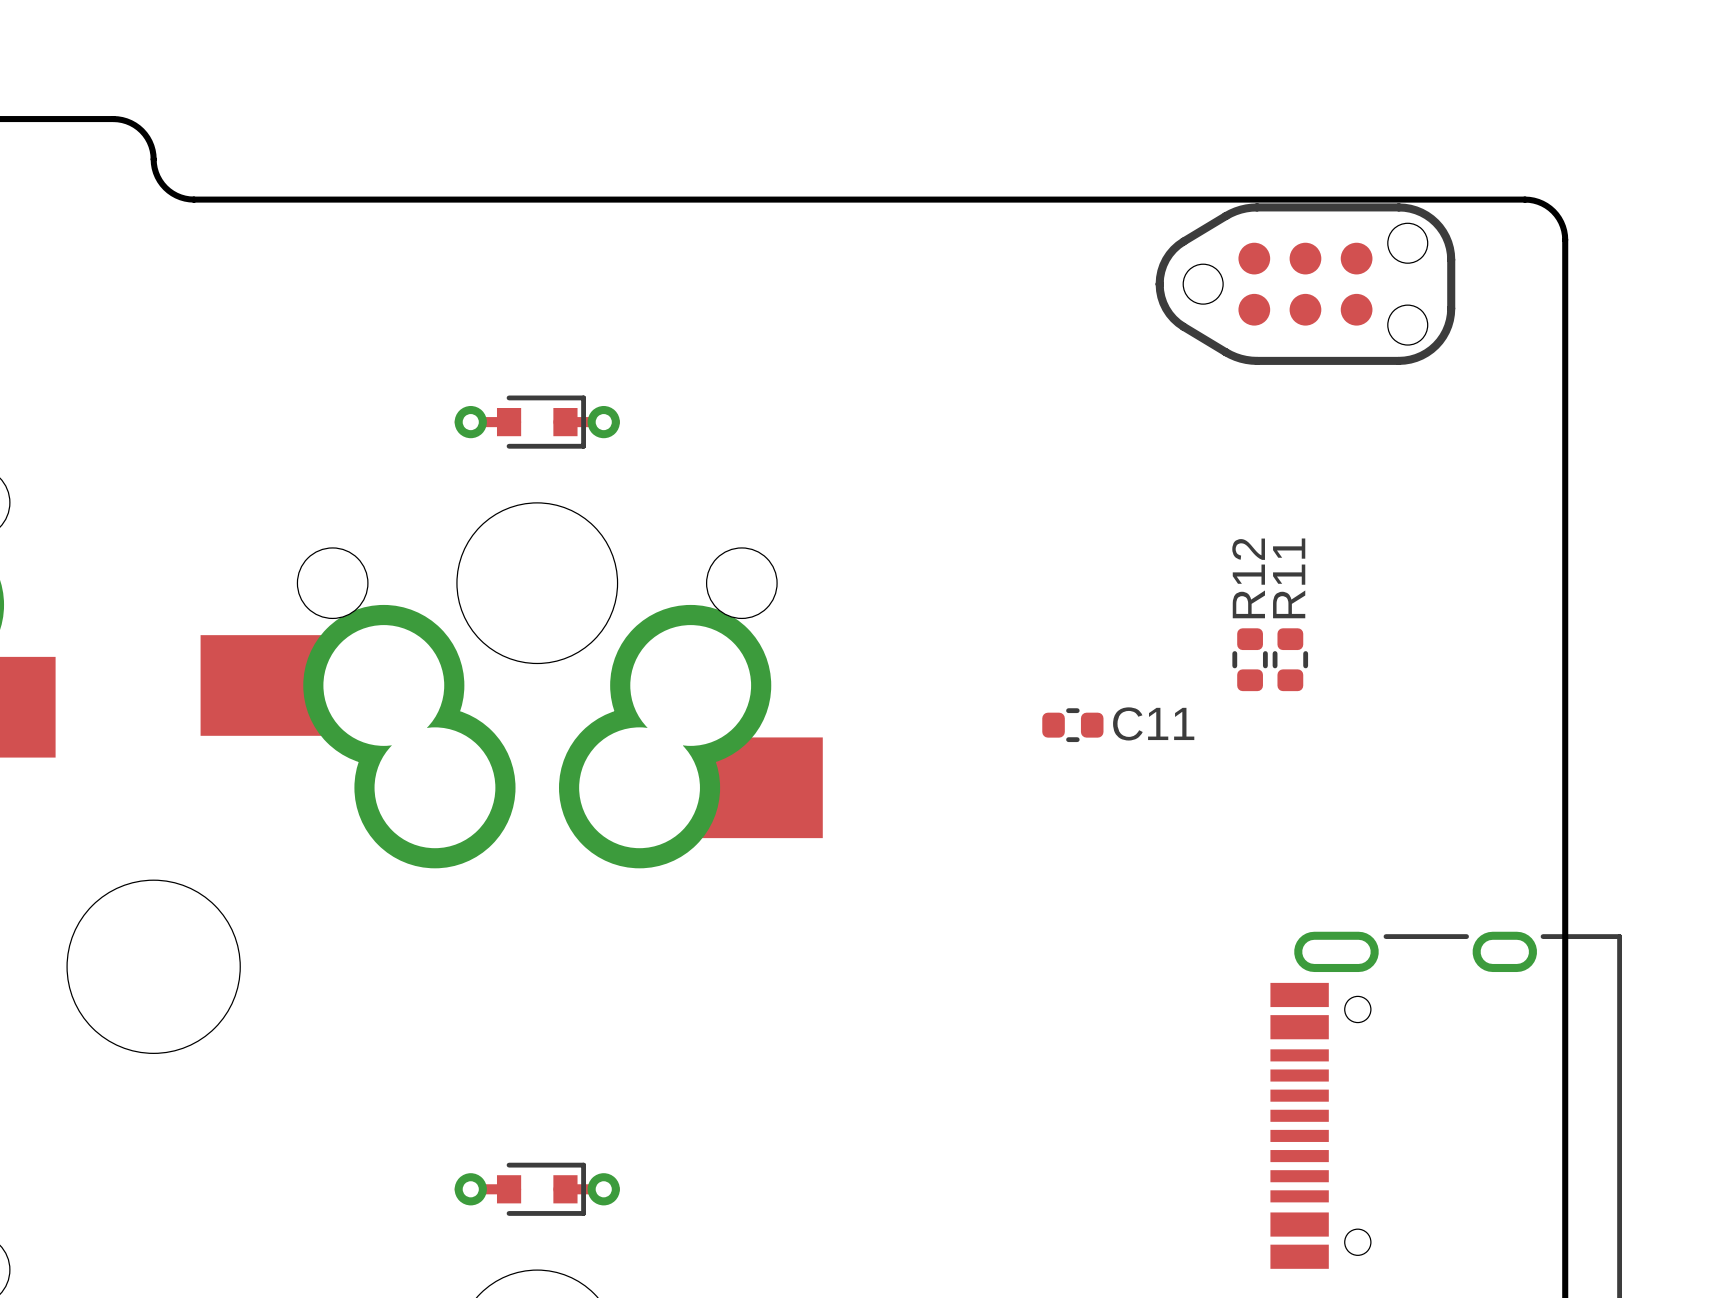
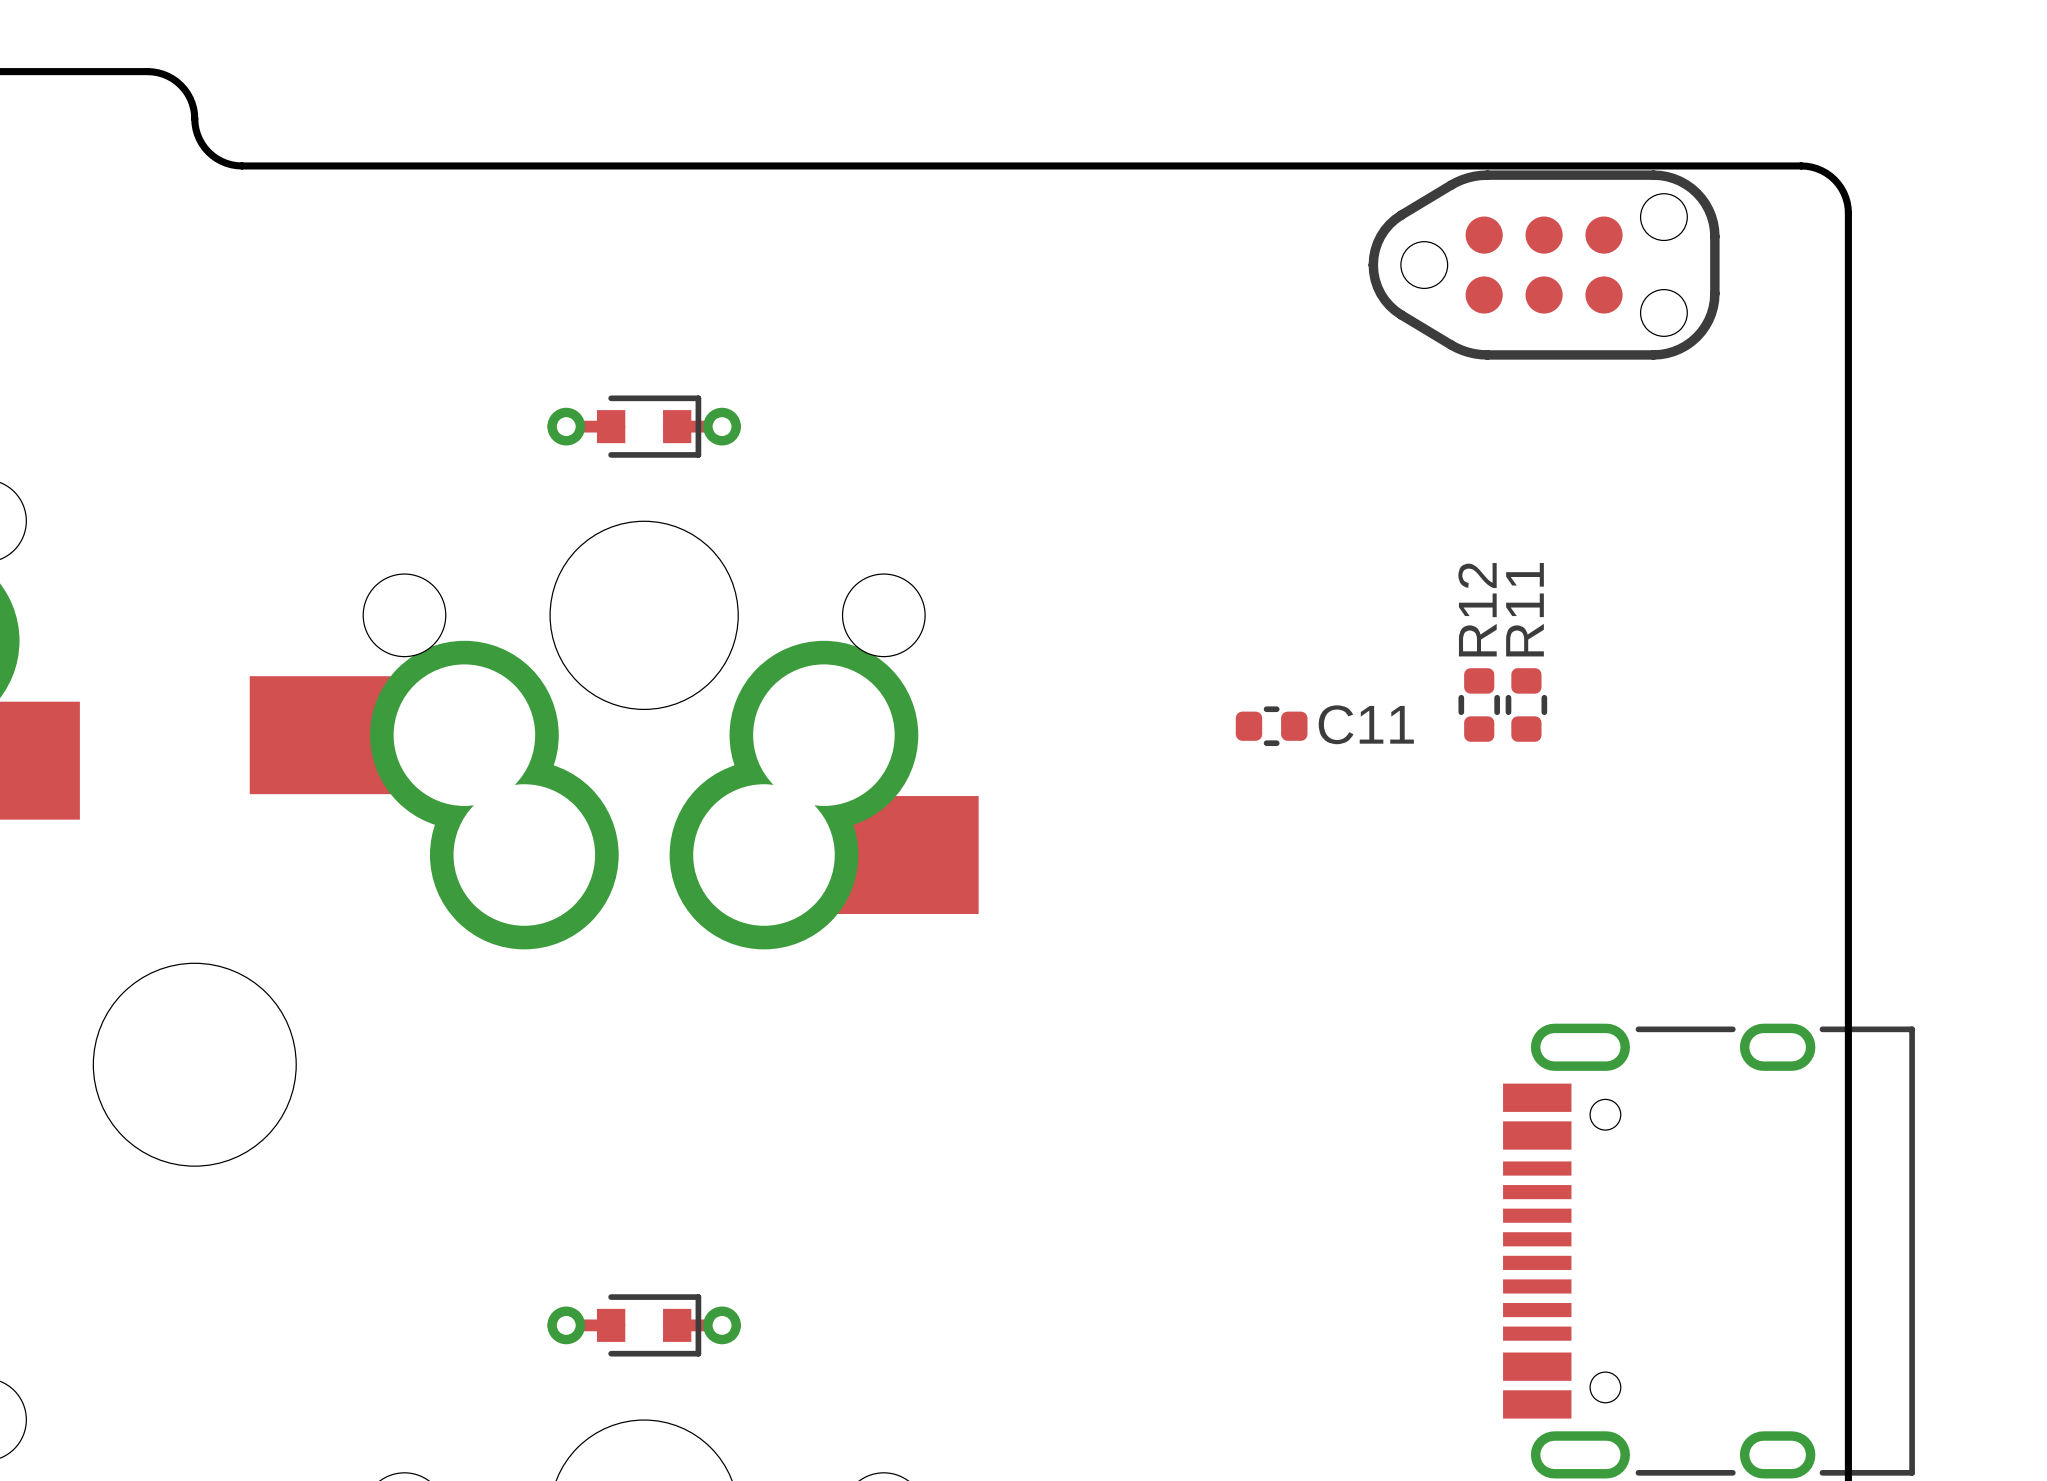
C11 position: (1072, 725) -> (1271, 726)

